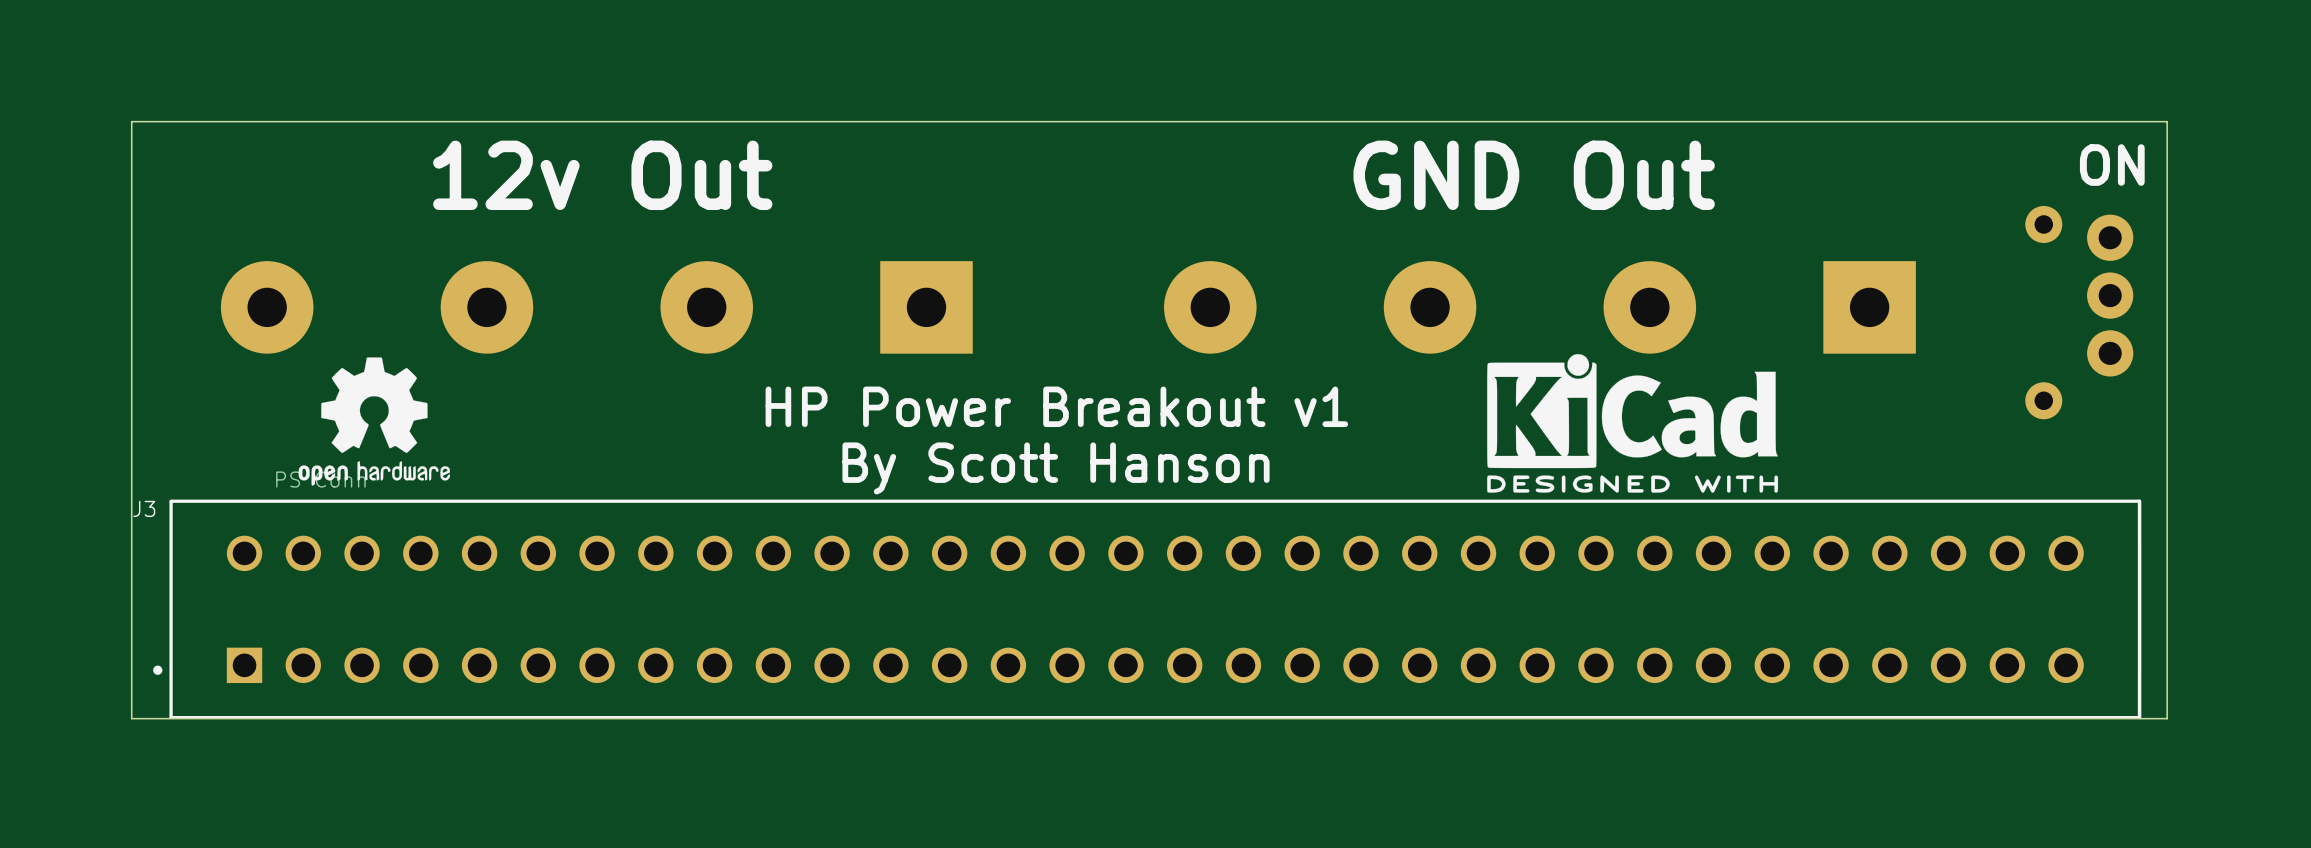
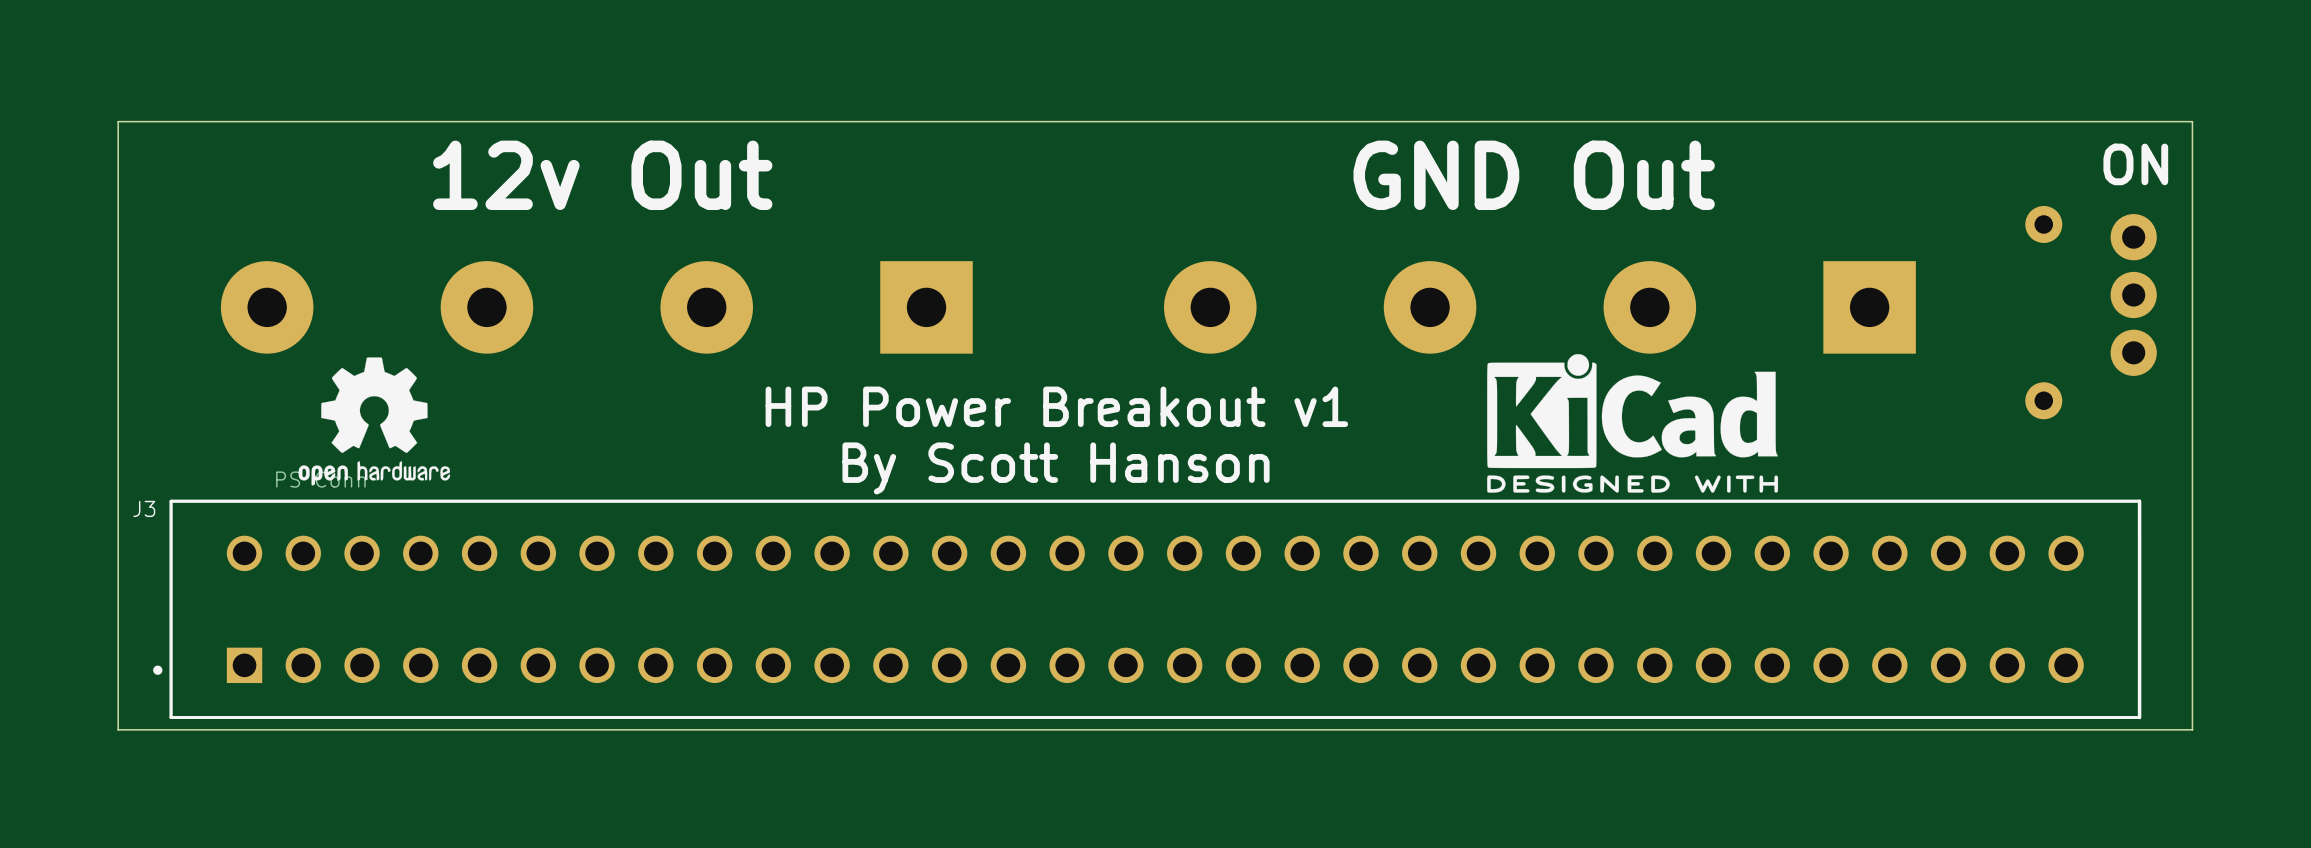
board edge: (2167, 121) (2167, 718) (131, 718) (131, 121) -> (2167, 121) (2192, 121) (2192, 729) (118, 729) (118, 121) (131, 121)
text position: ON (2112, 165) -> ON (2135, 164)
part position: (2110, 295) -> (2133, 294)

